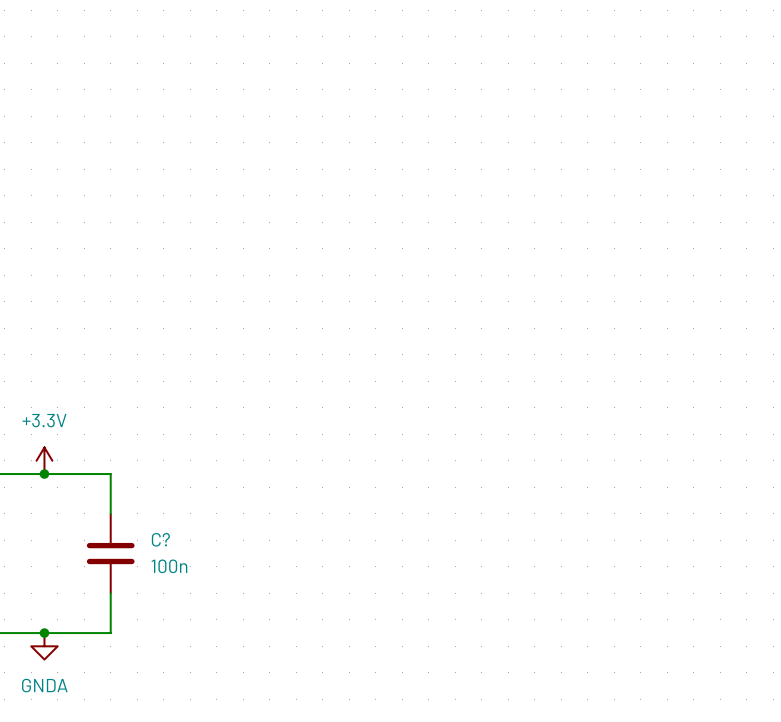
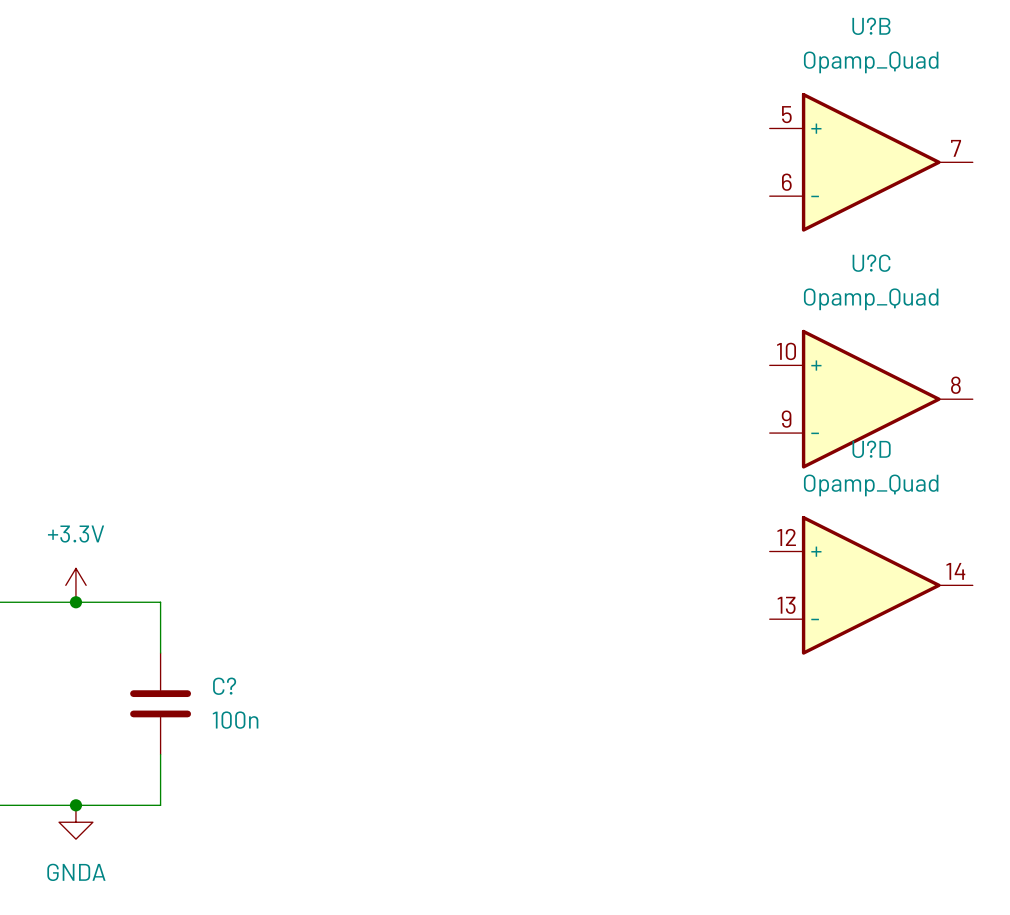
U?B: none -> Opamp_Quad (871, 162)
U?C: none -> Opamp_Quad (871, 399)
U?D: none -> Opamp_Quad (871, 585)

